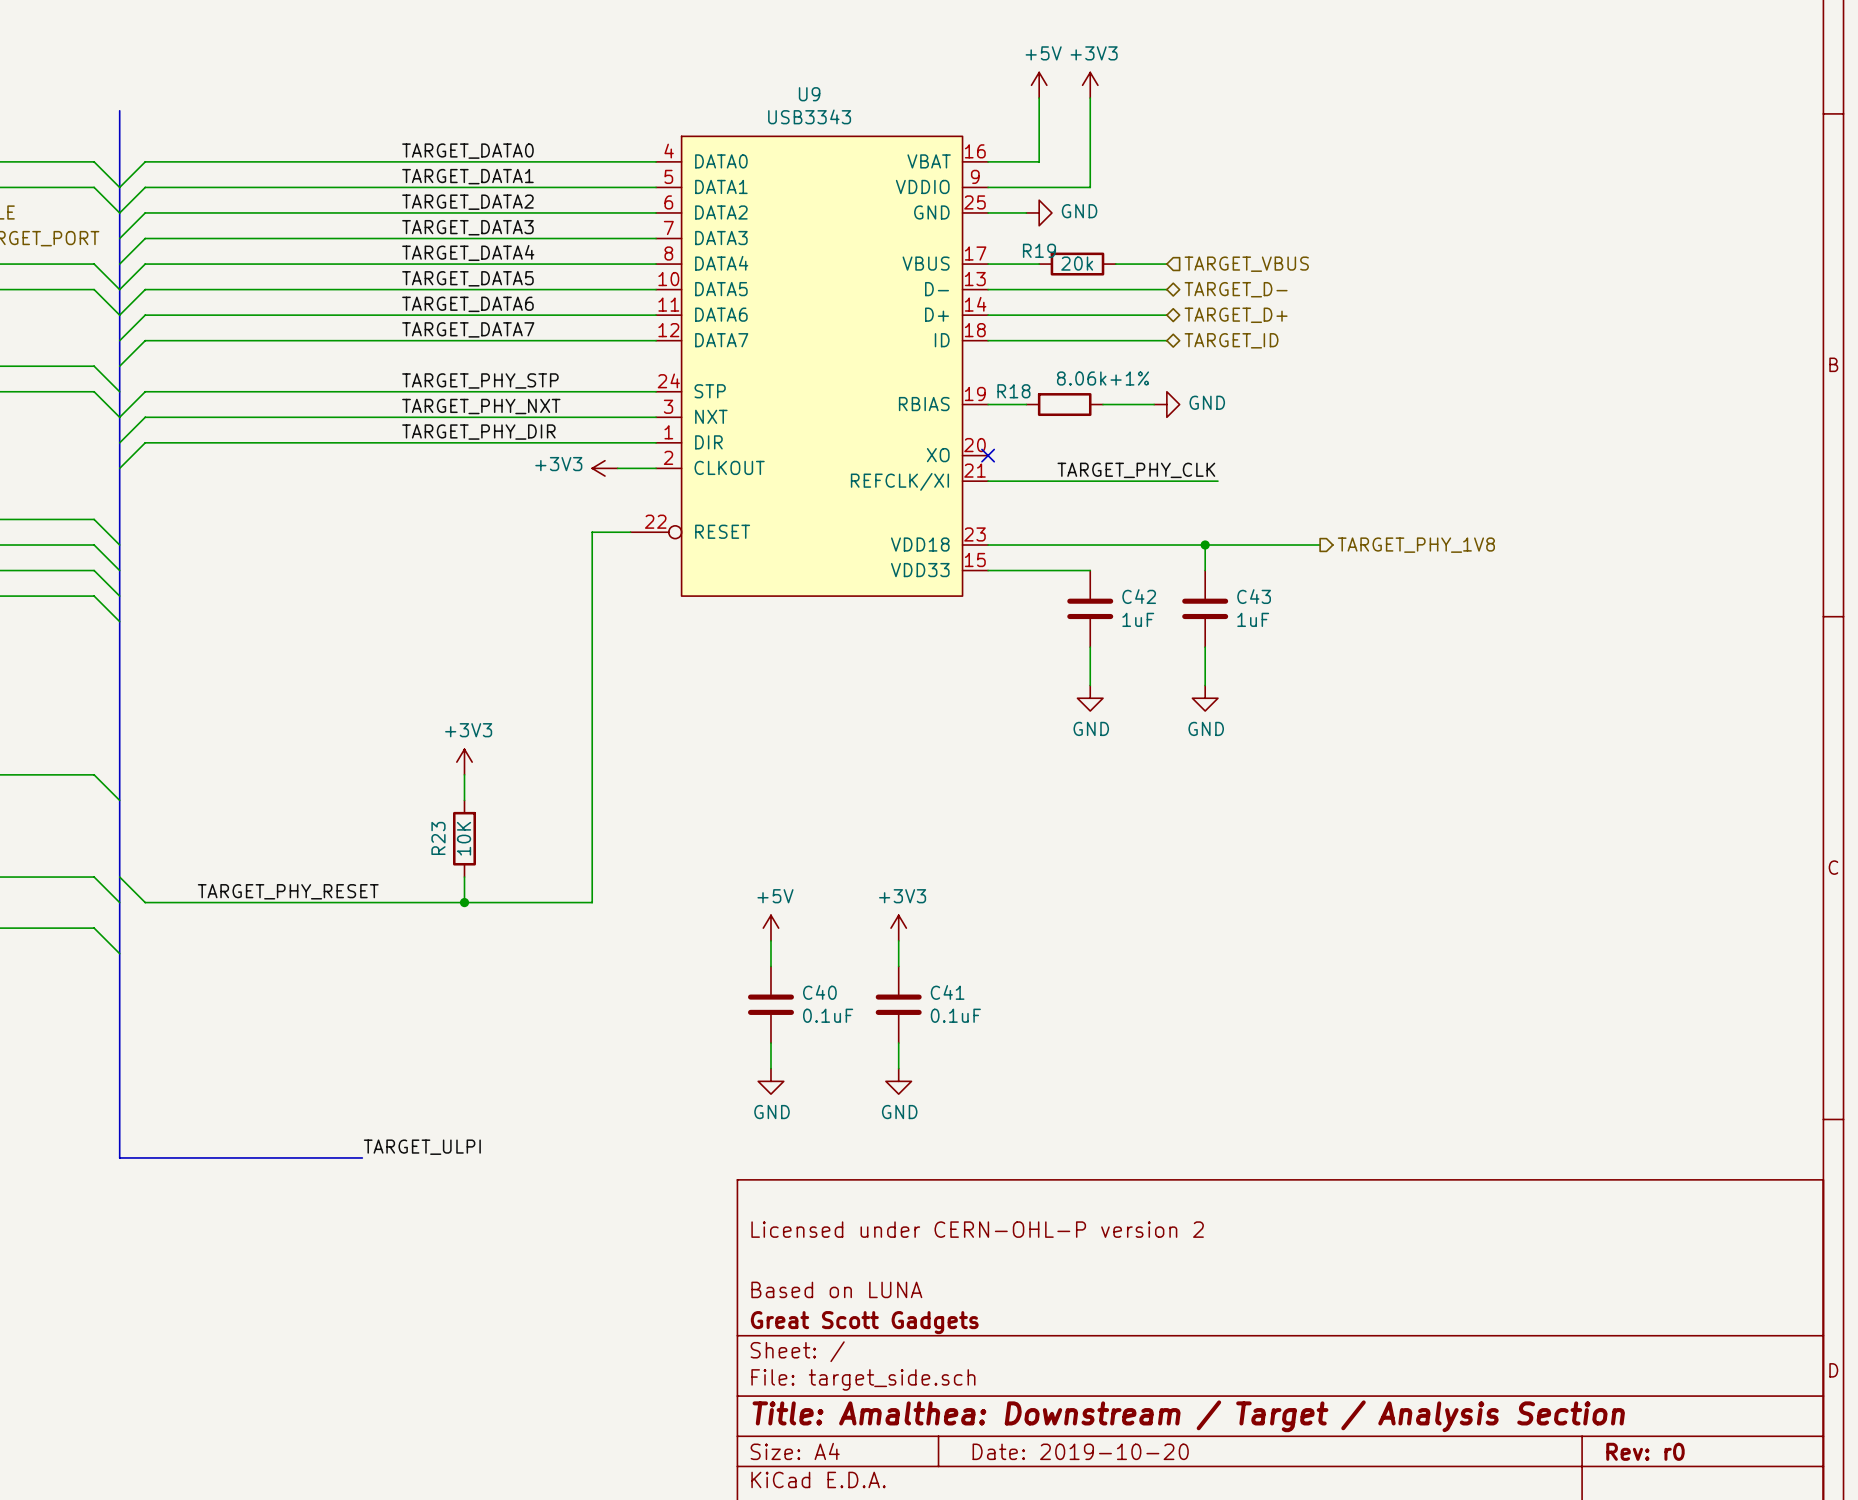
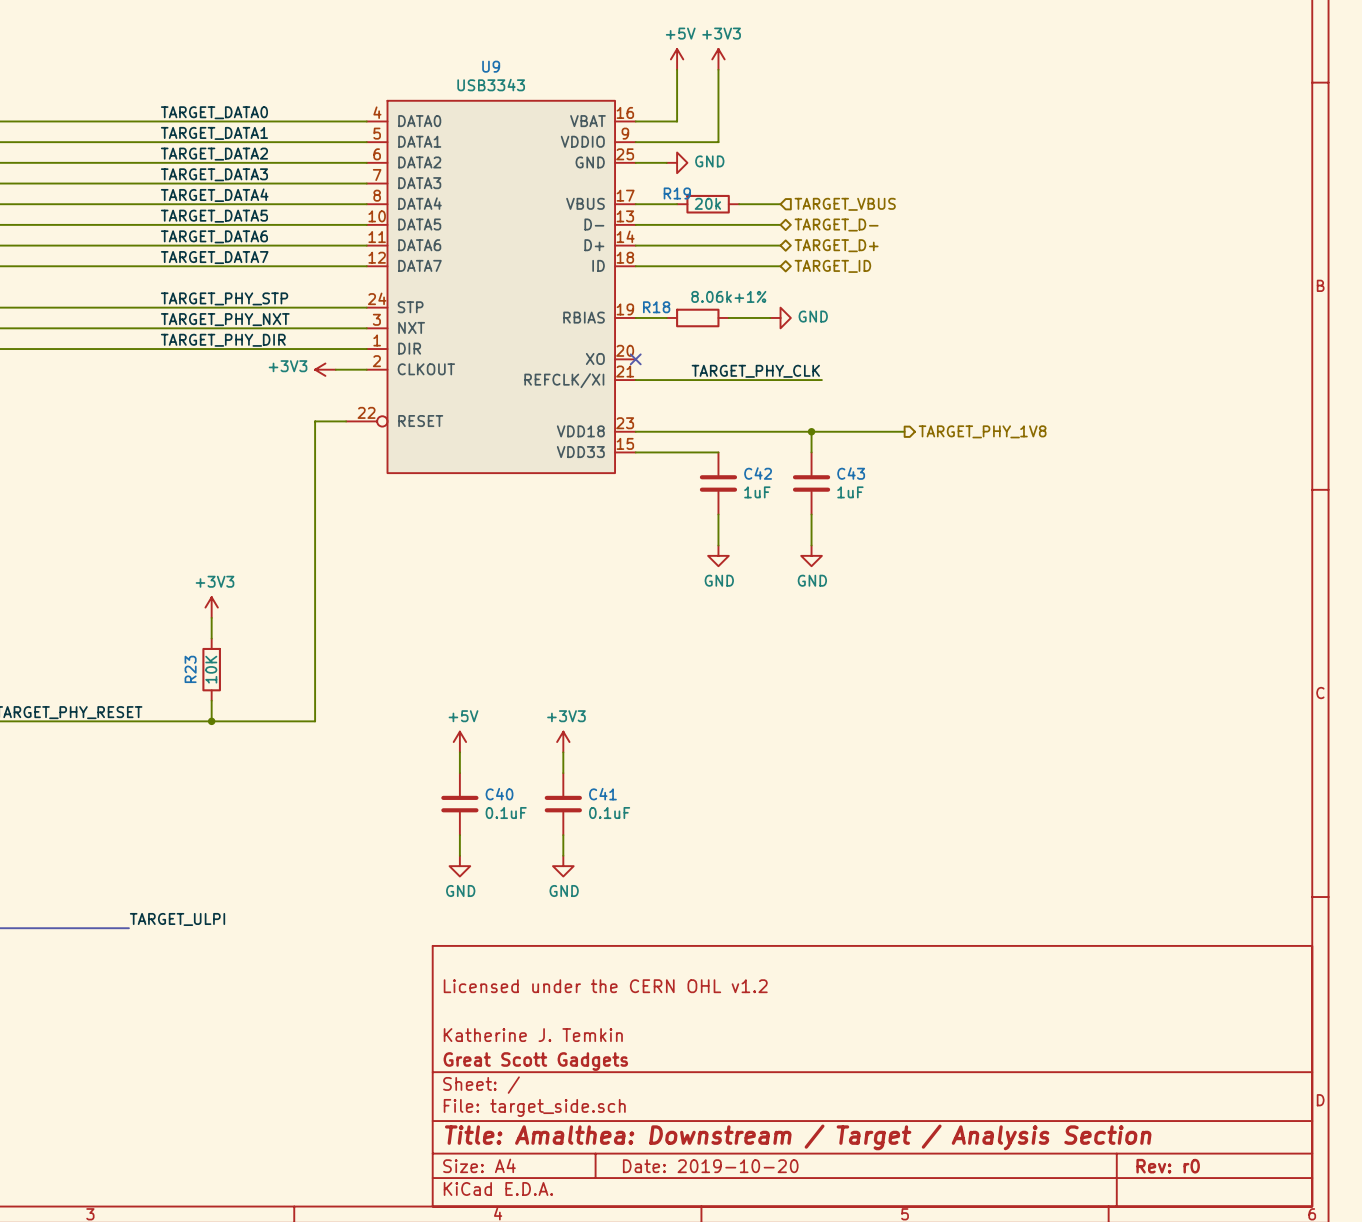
title block: Licensed under CERN-OHL-P version 2 (977, 1229) -> Licensed under the CERN OHL v1.2 (605, 986)
title block: Based on LUNA (836, 1289) -> Katherine J. Temkin (533, 1035)

